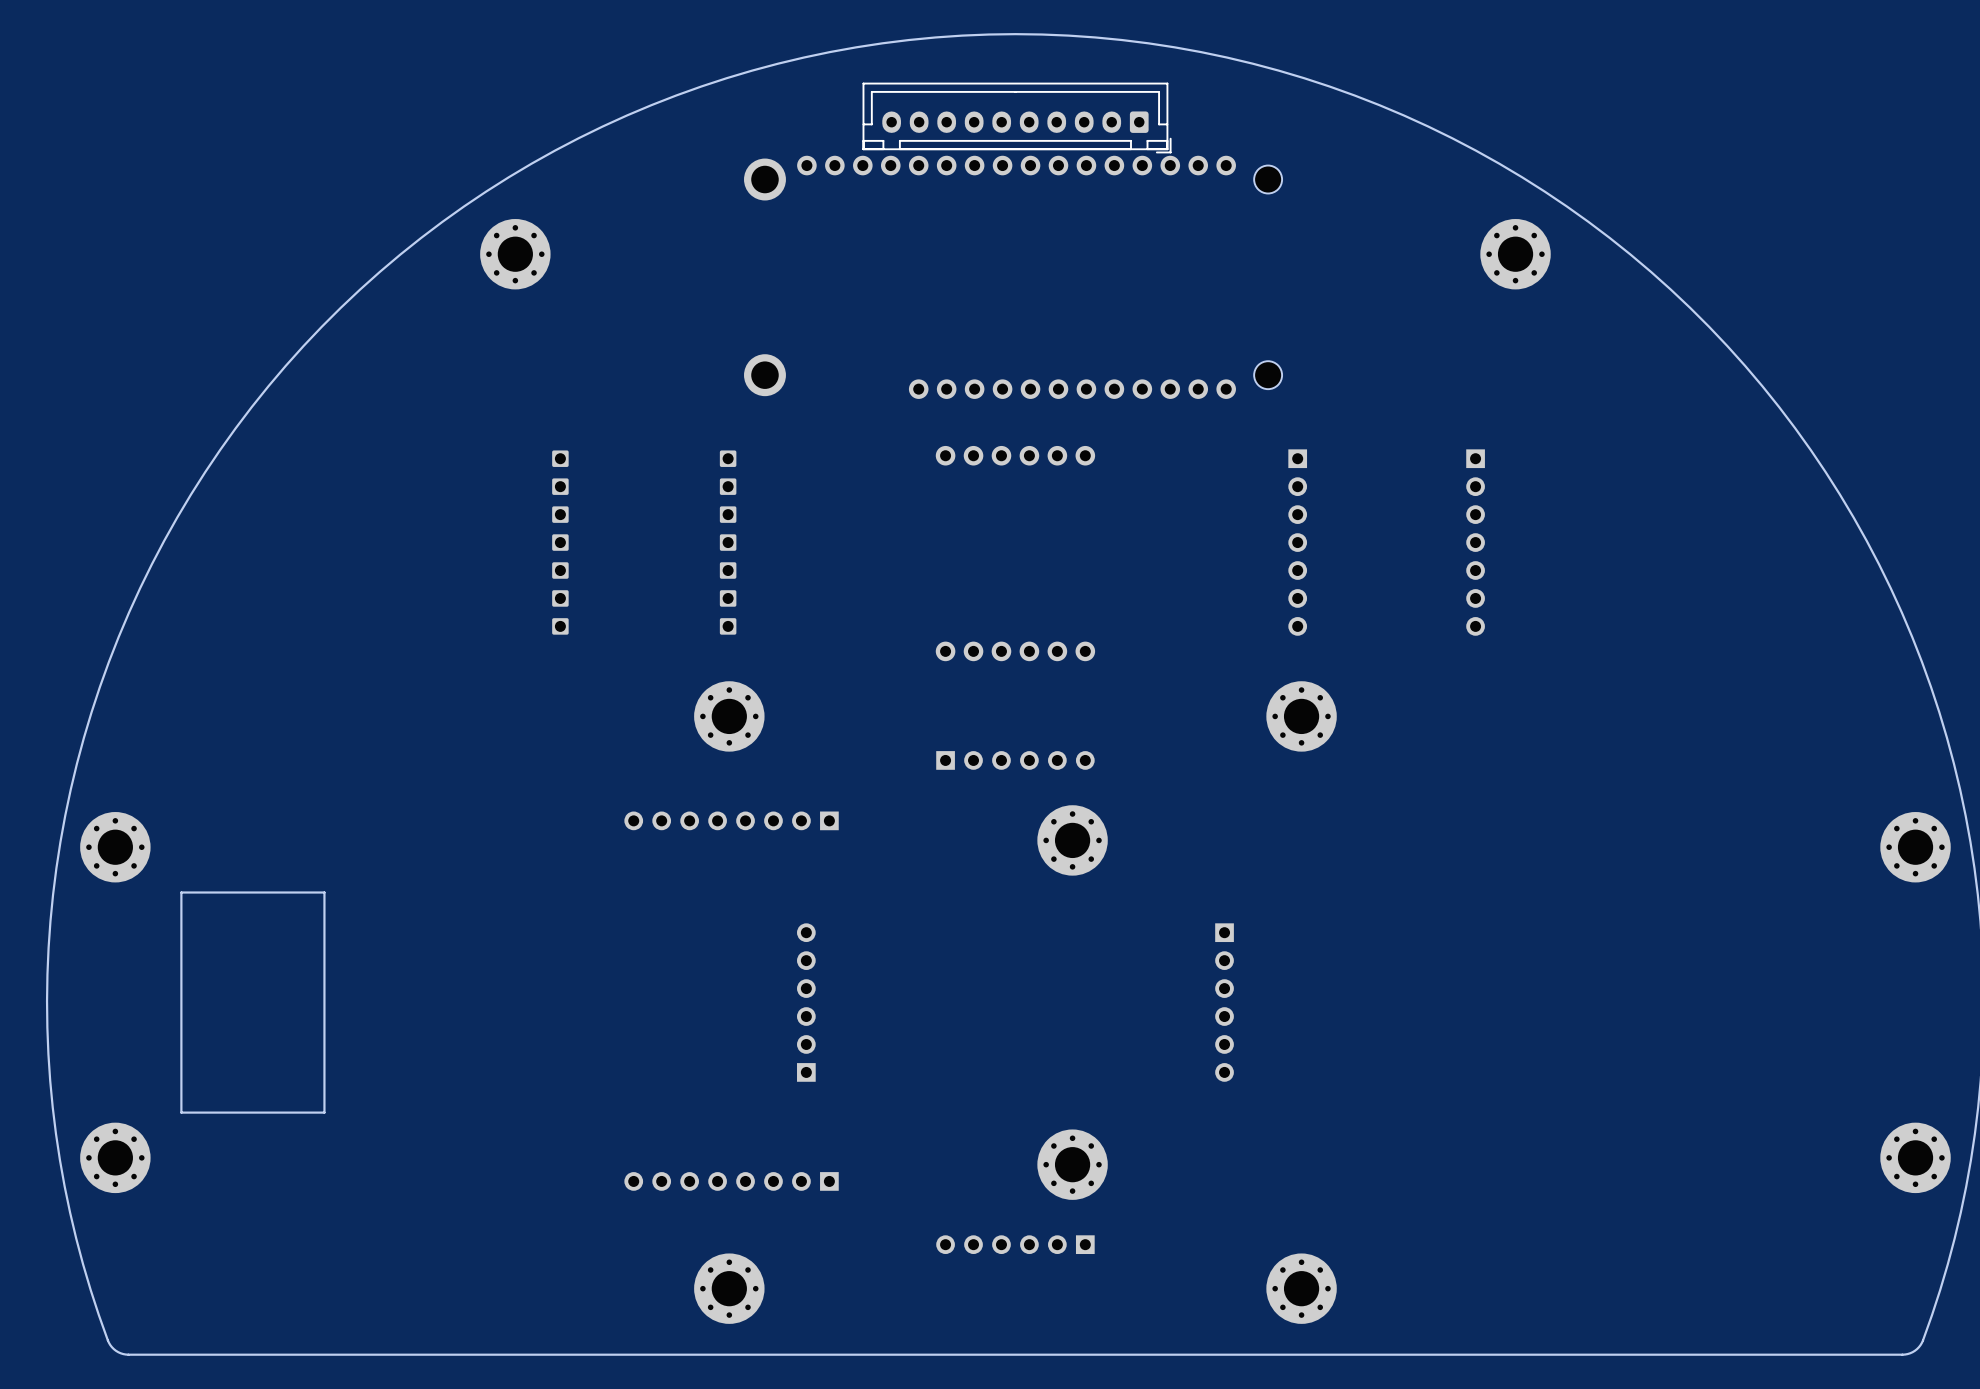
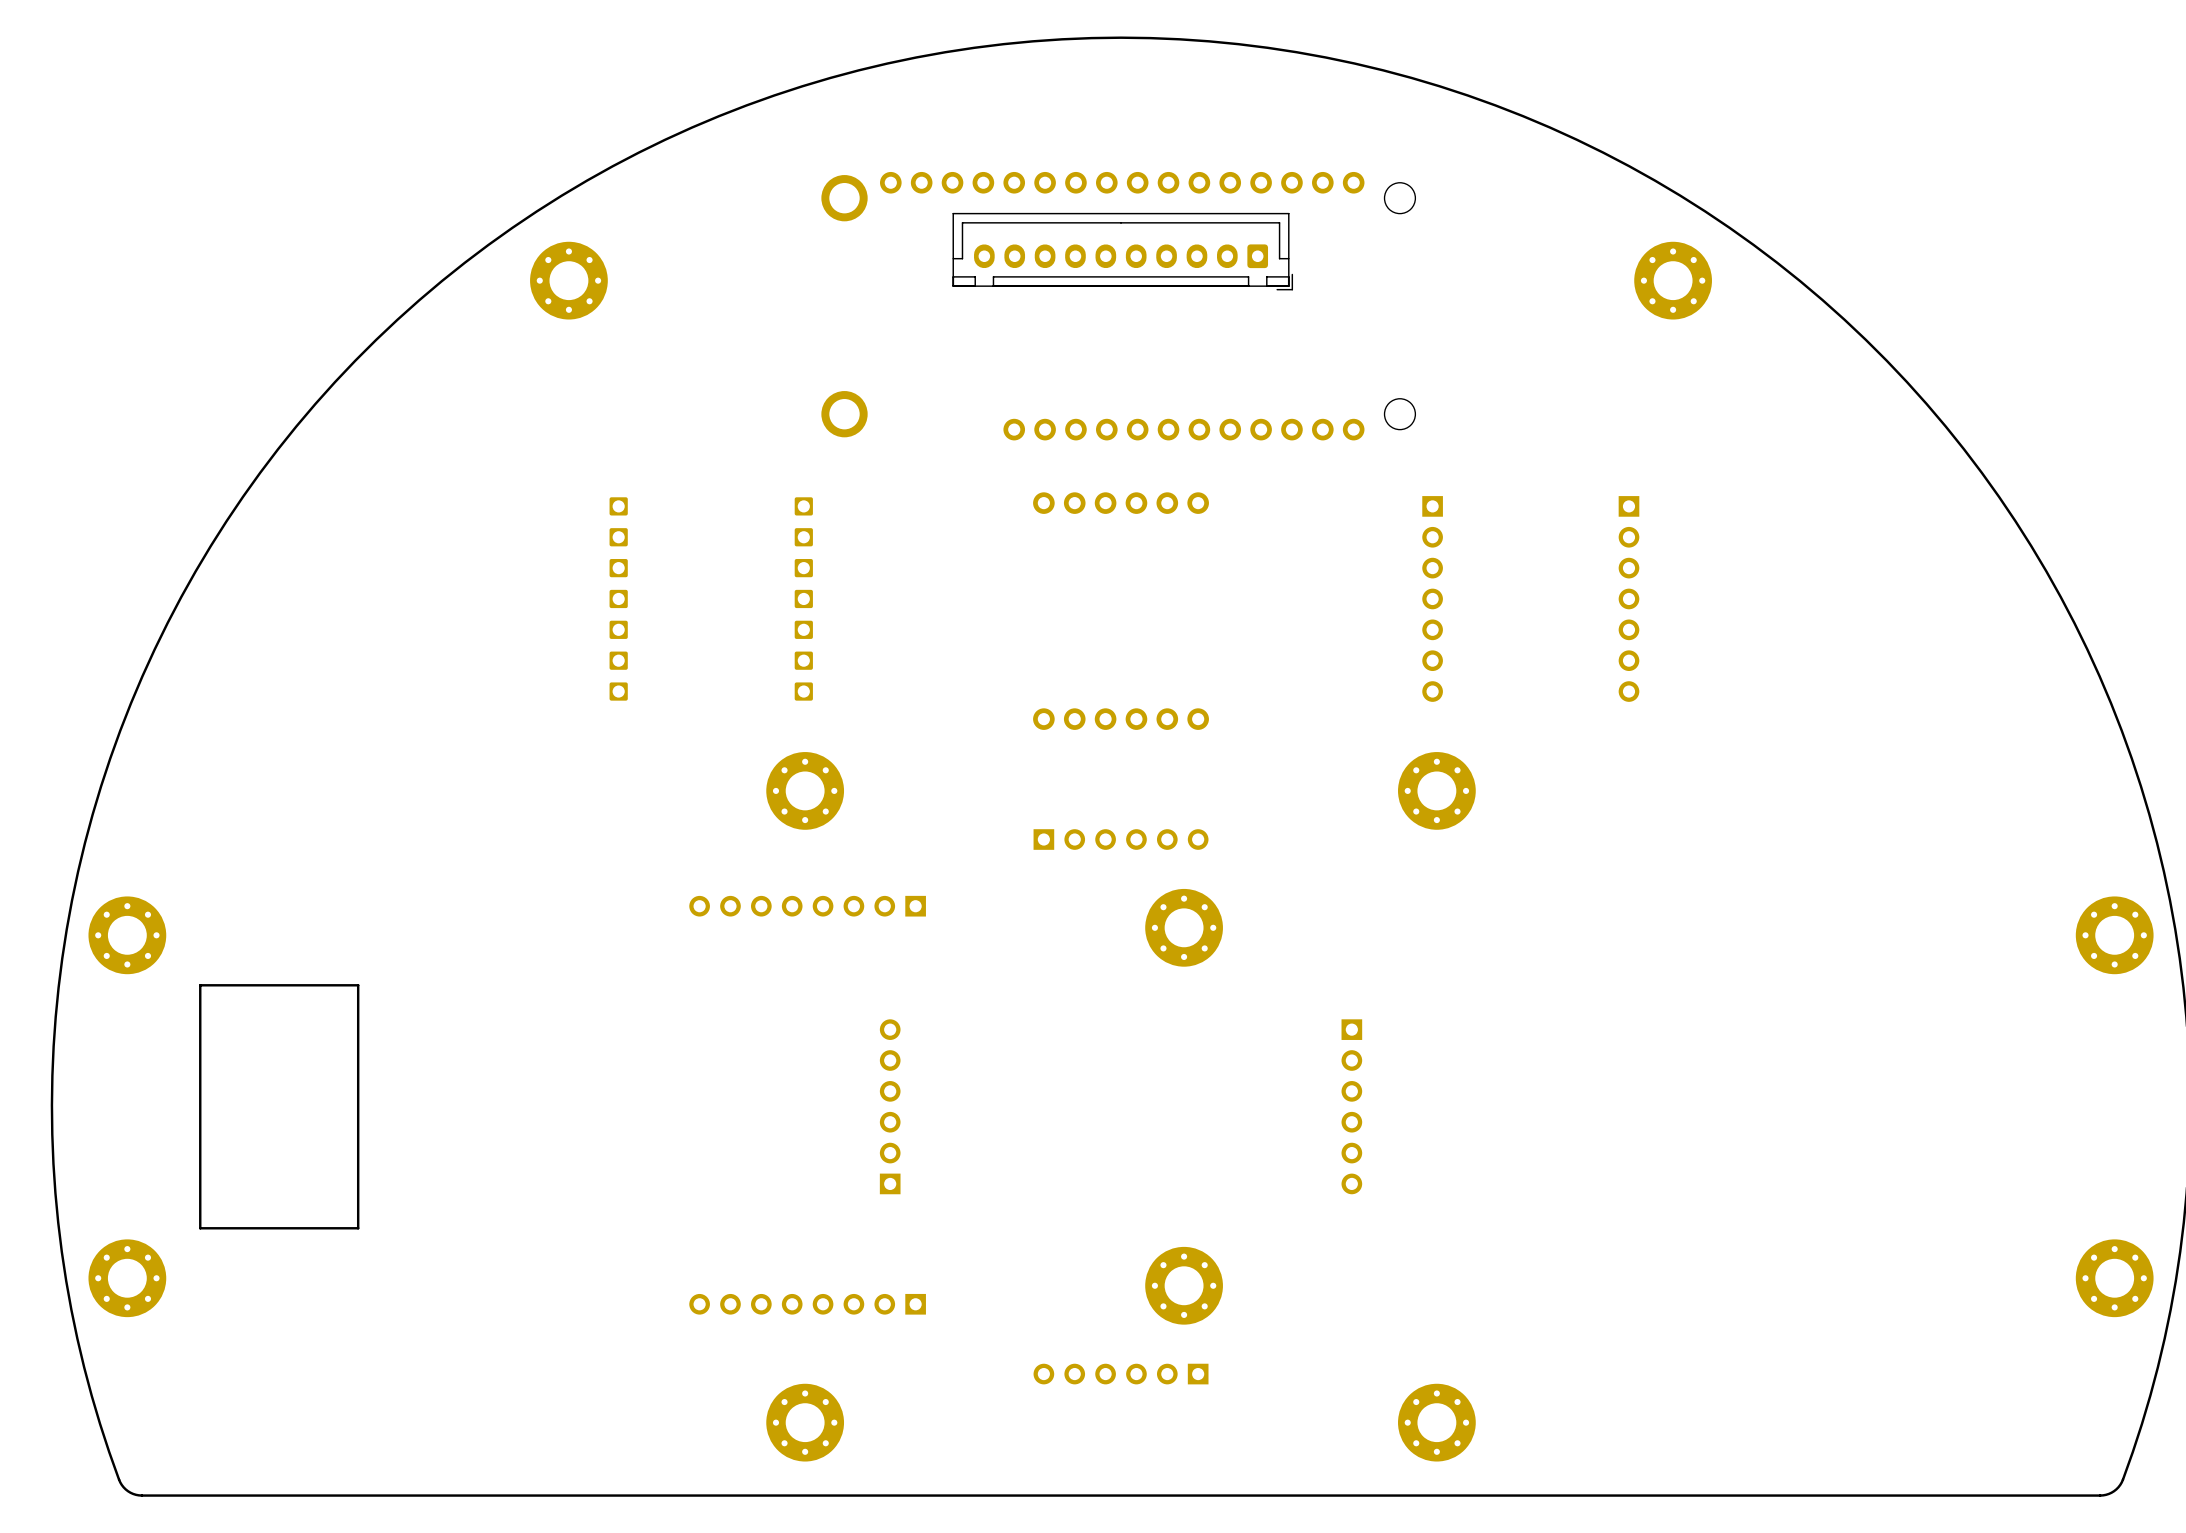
part position: (1017, 118) -> (1122, 251)

